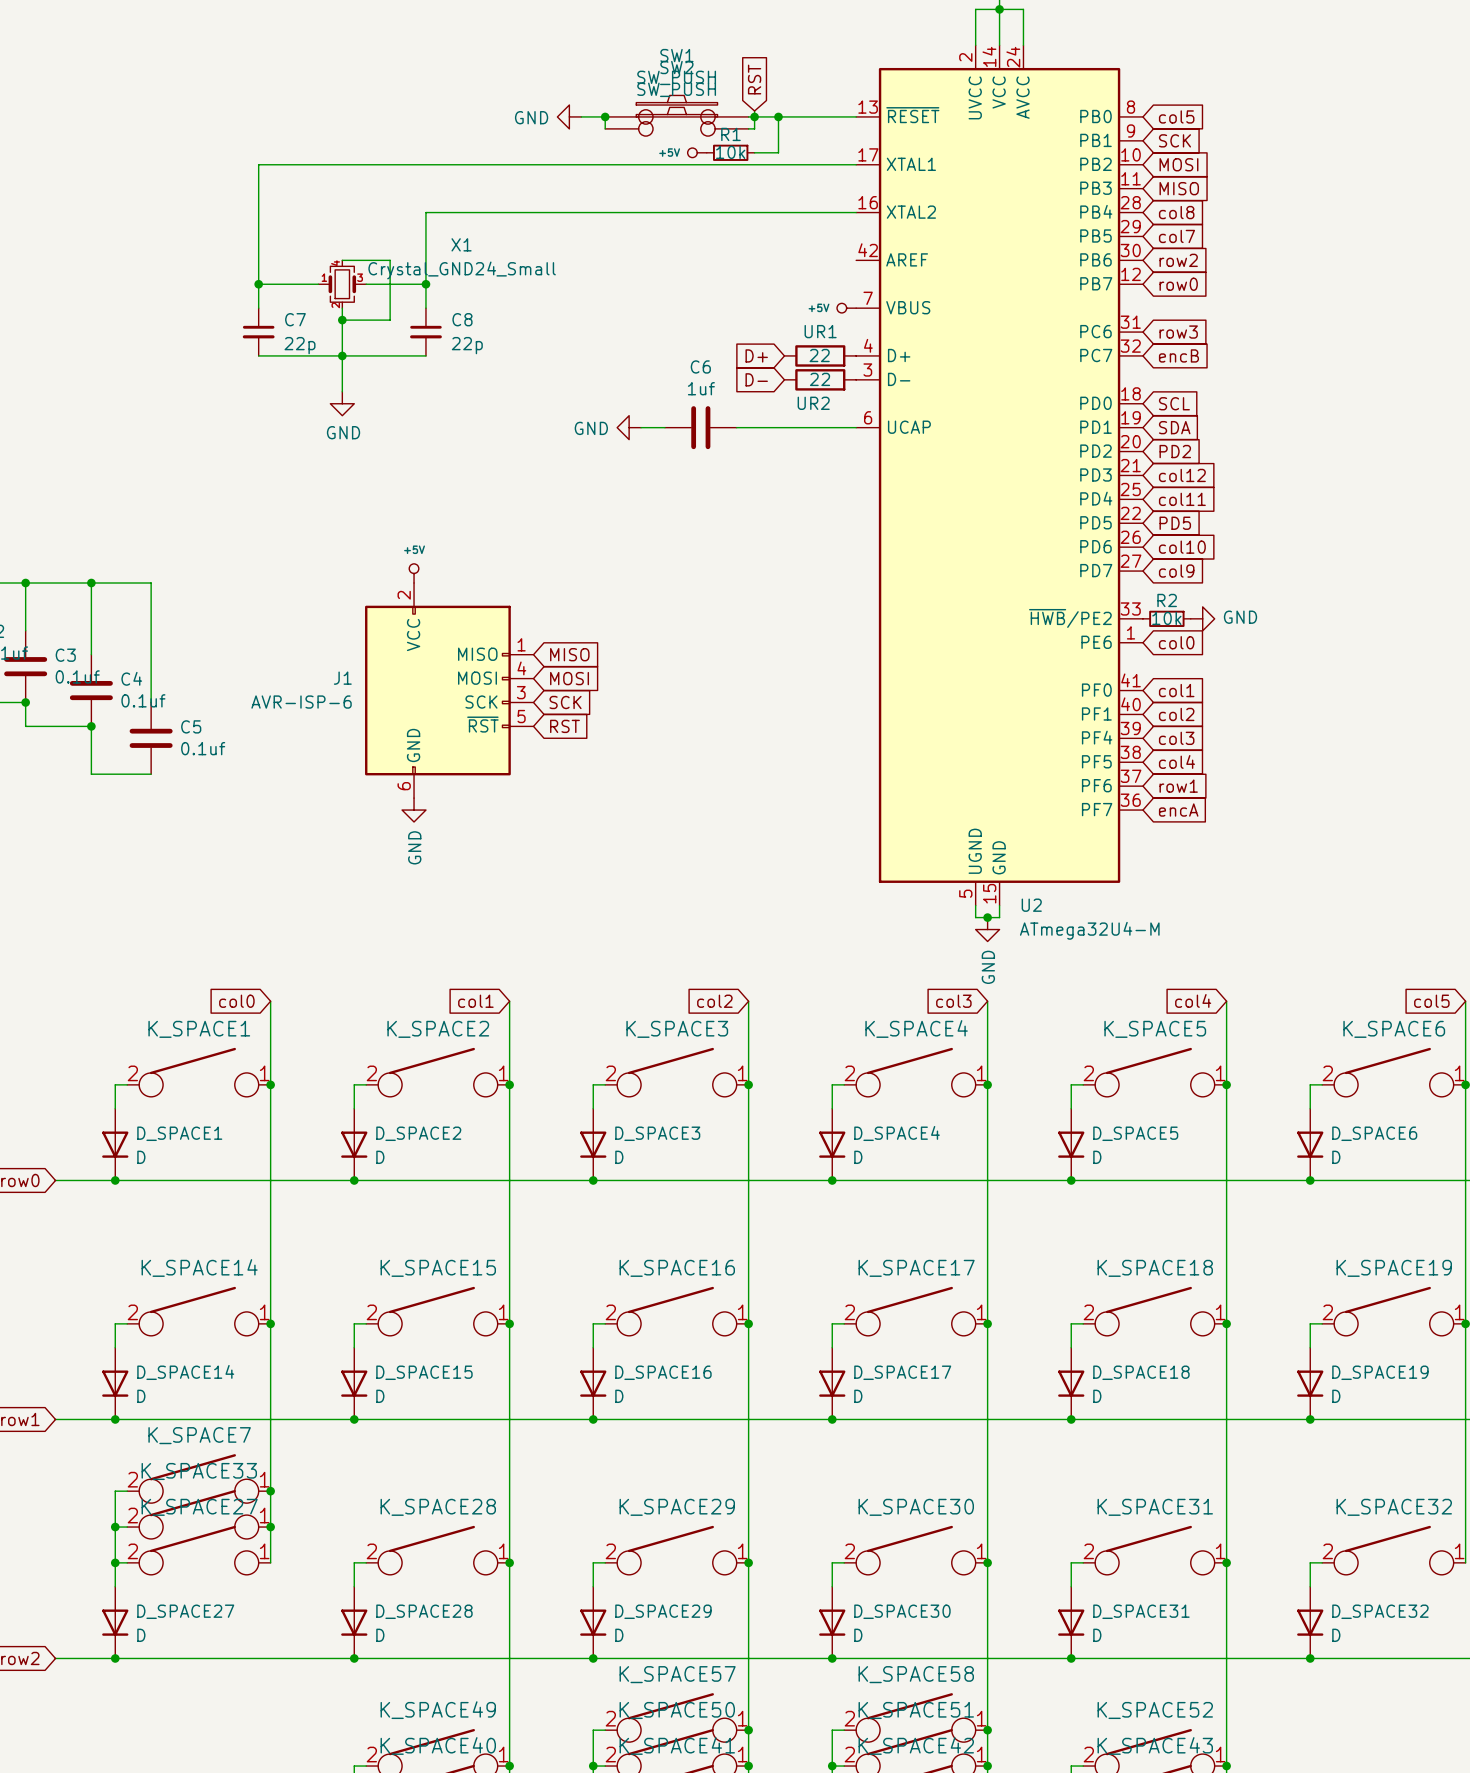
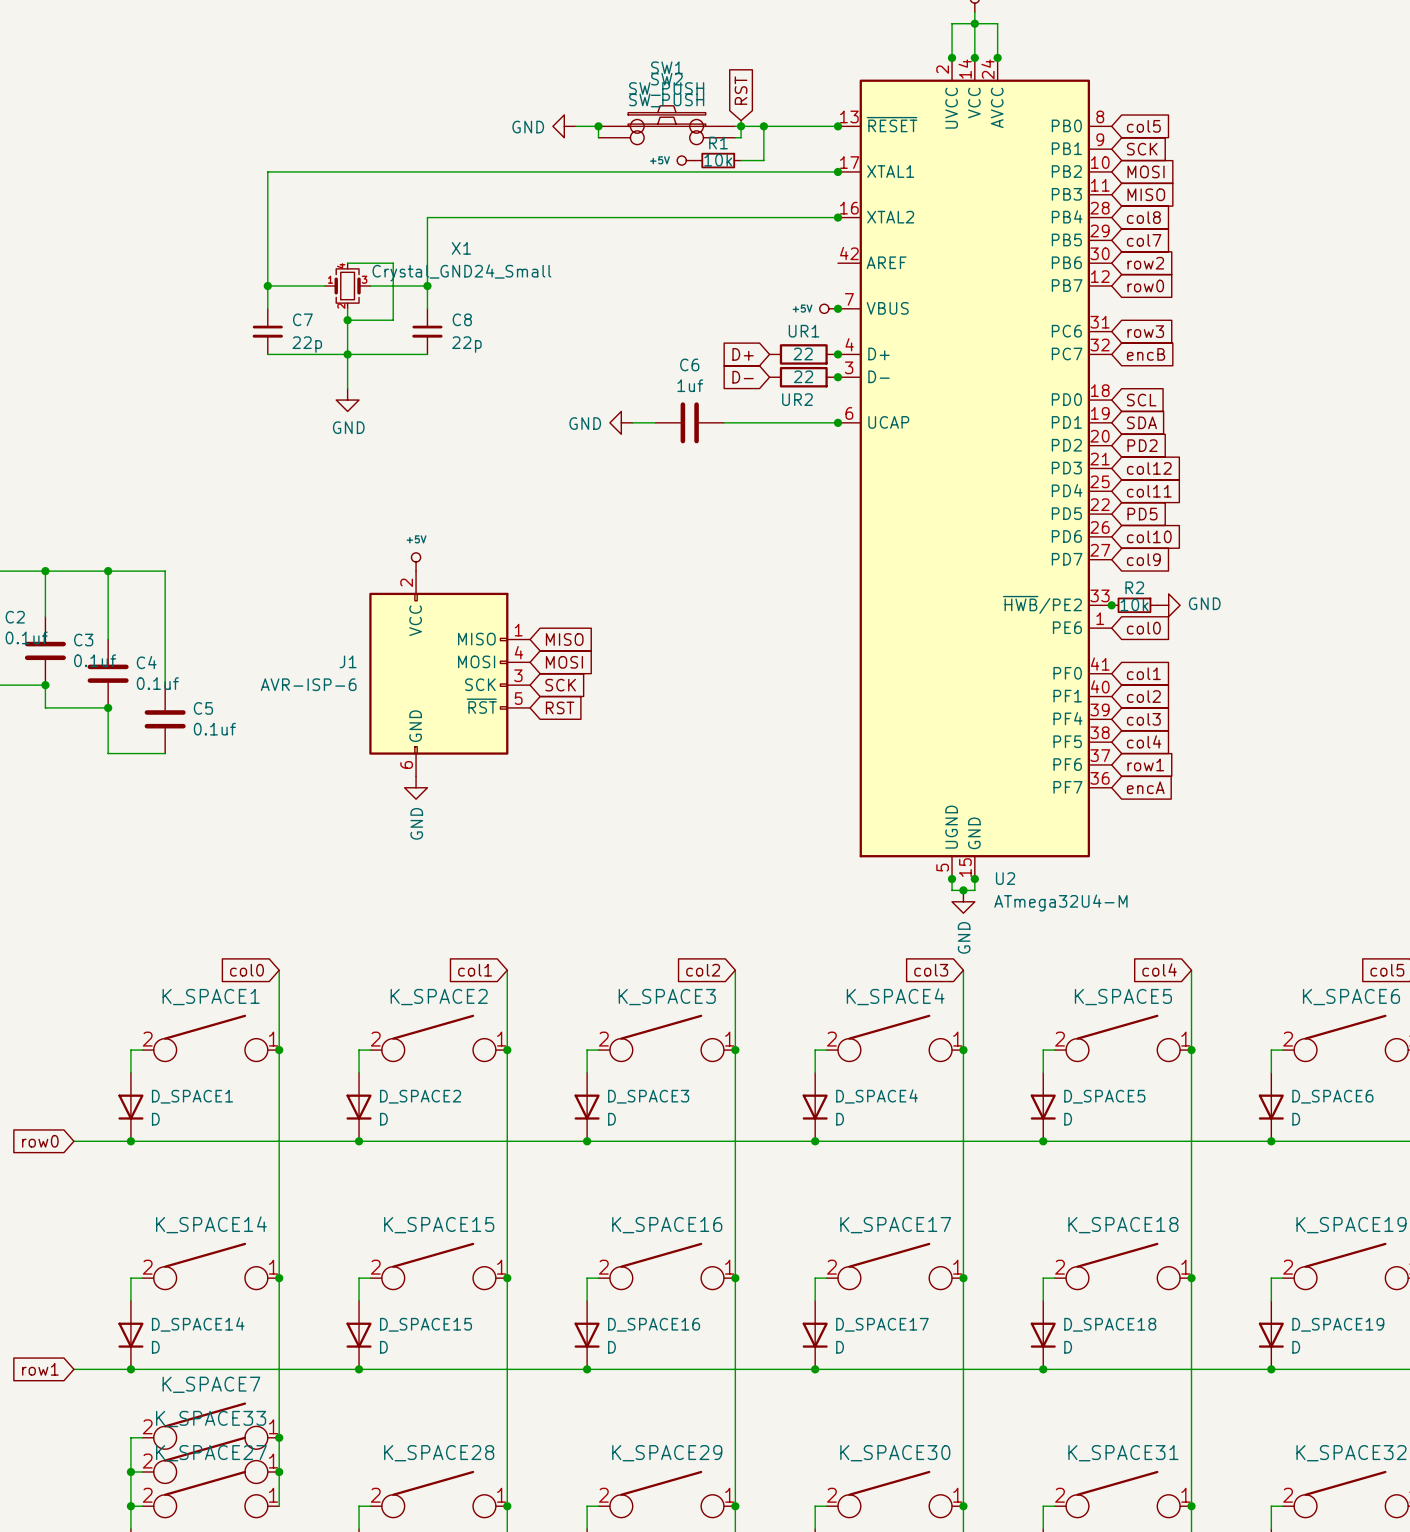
junction: none -> (952, 57)
junction: none -> (974, 57)
junction: none -> (997, 57)
junction: none -> (837, 126)
junction: none -> (837, 171)
junction: none -> (837, 217)
junction: none -> (837, 308)
junction: none -> (837, 354)
junction: none -> (837, 377)
junction: none -> (837, 422)
junction: none -> (1111, 605)
junction: none -> (952, 879)
junction: none -> (974, 879)

